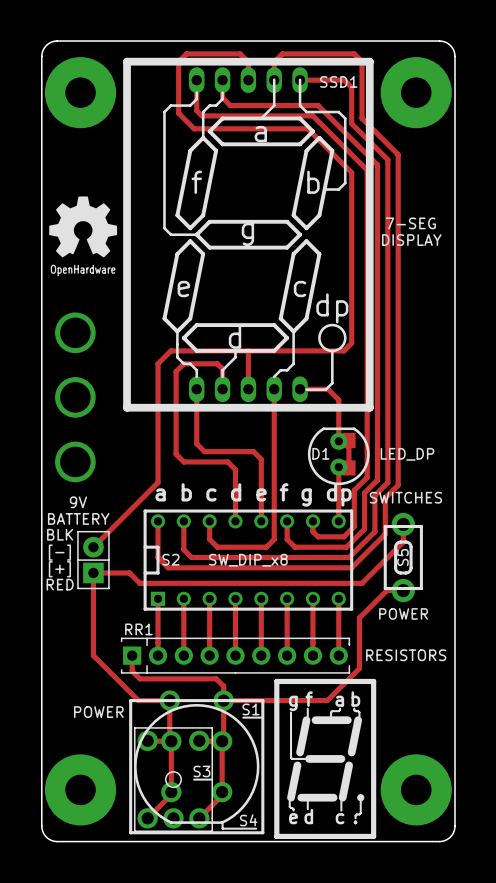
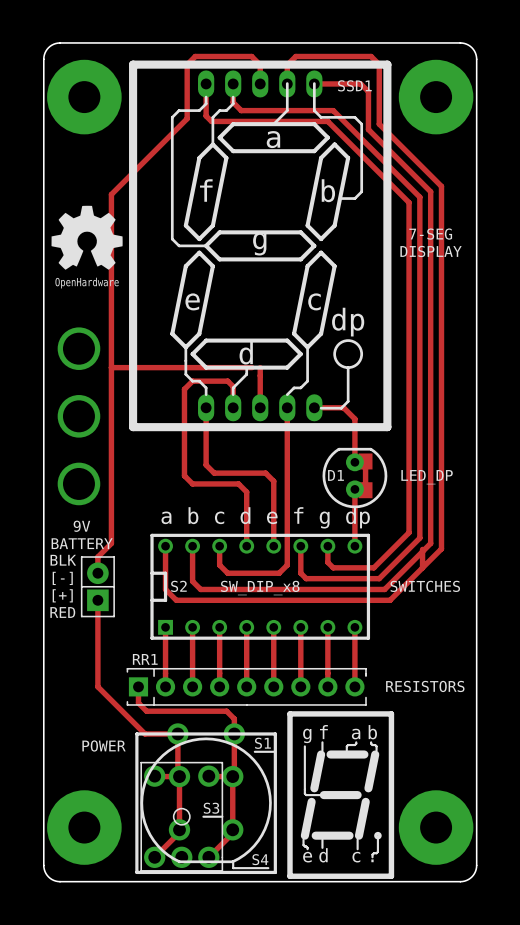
track: (178, 113) (194, 128) (307, 128) (351, 172) (351, 343) (343, 350) (240, 350) -> (187, 118) (111, 194) (111, 543) (97, 557) (97, 573)
track: (398, 154) (398, 485) (385, 498) (385, 534) (351, 567) (168, 567) (158, 557) -> (417, 162) (441, 186) (441, 548) (422, 567)
track: (387, 159) (387, 482) (374, 495) (374, 531) (349, 557) (191, 557) (183, 549) -> (406, 167) (430, 191) (430, 543) (384, 589) (200, 589) (192, 581) (192, 575)
track: (377, 164) (377, 480) (364, 492) (364, 529) (346, 547) (294, 547) (287, 539) -> (395, 172) (419, 197) (419, 538) (379, 578) (306, 578) (300, 573) (300, 565)
track: (367, 170) (367, 477) (354, 490) (354, 526) (343, 536) (318, 536) (312, 531) -> (384, 178) (409, 202) (409, 532) (373, 567) (333, 567) (327, 562) (327, 557)
track: (170, 350) (158, 363) (158, 482) (93, 547) -> (179, 367) (111, 367)
text position: SWITCHES (405, 497) -> SWITCHES (425, 586)
S5: POWER (403, 557) -> none
track: (93, 573) (129, 573) (139, 583) (362, 583) (372, 573) -> (165, 584) (165, 589) (176, 600) (390, 600)
track: (403, 590) (386, 590) (359, 618) (359, 668) (327, 700) (223, 700) -> none

